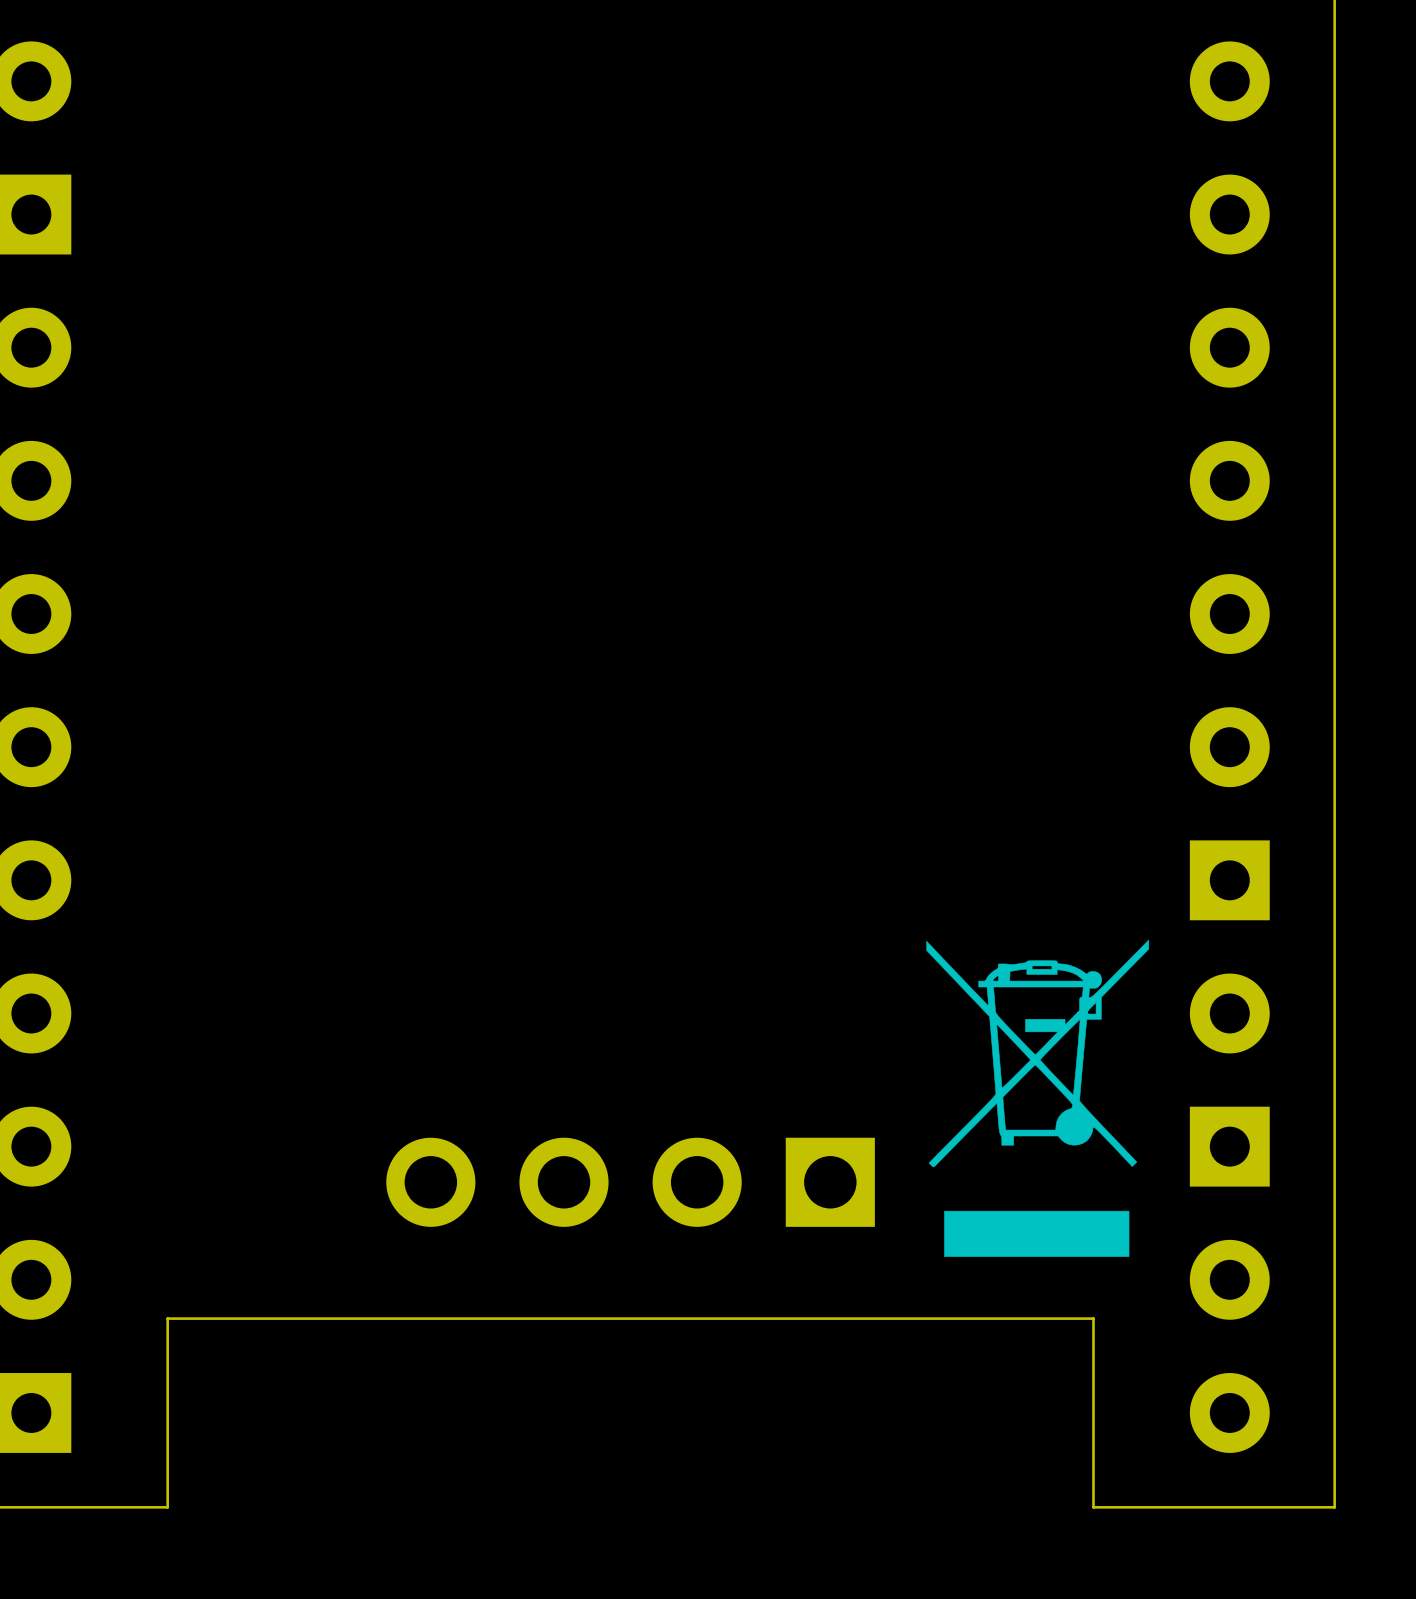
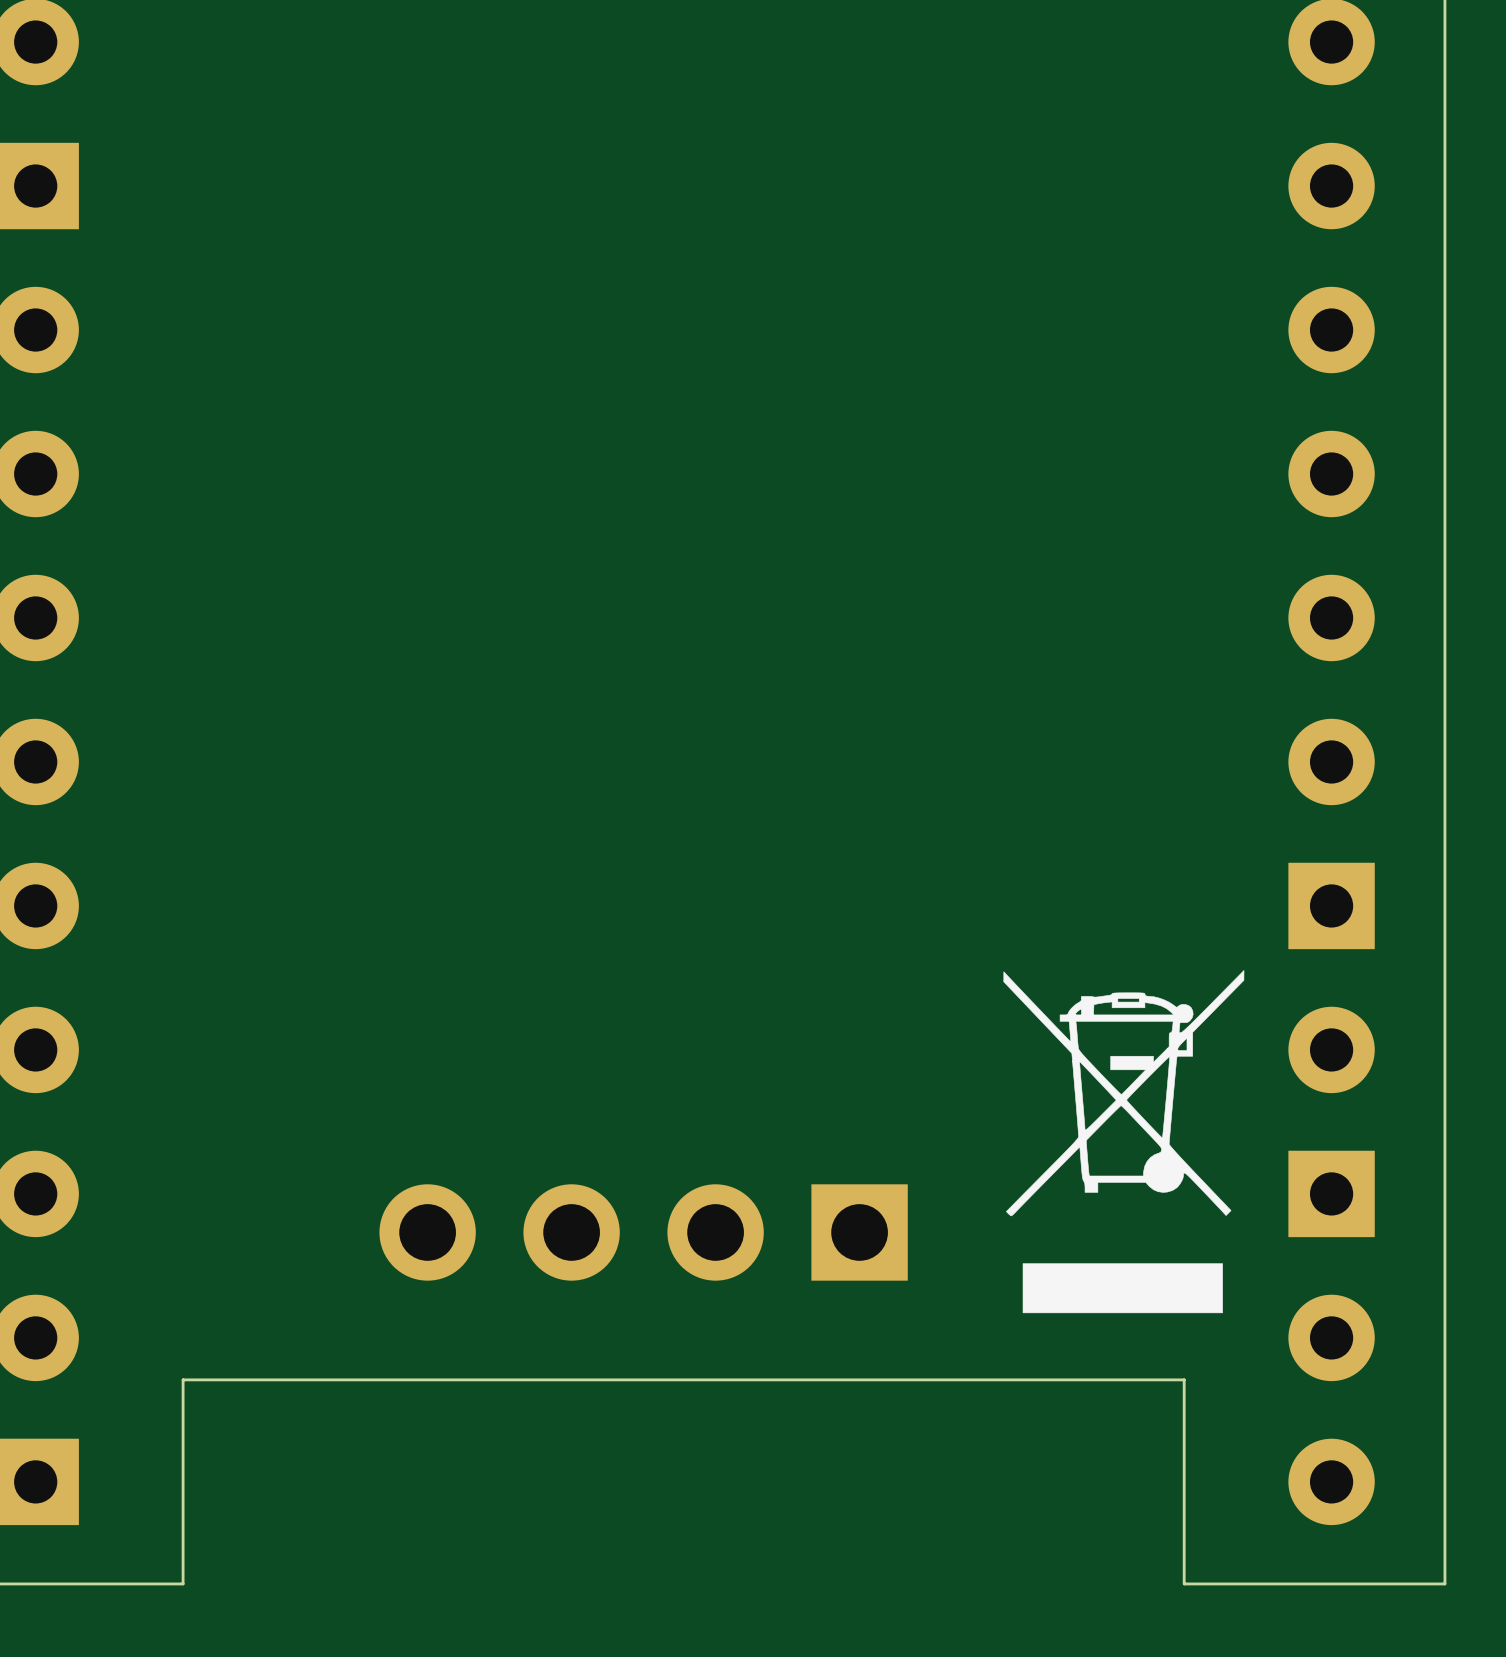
part position: (630, 1182) -> (643, 1232)

